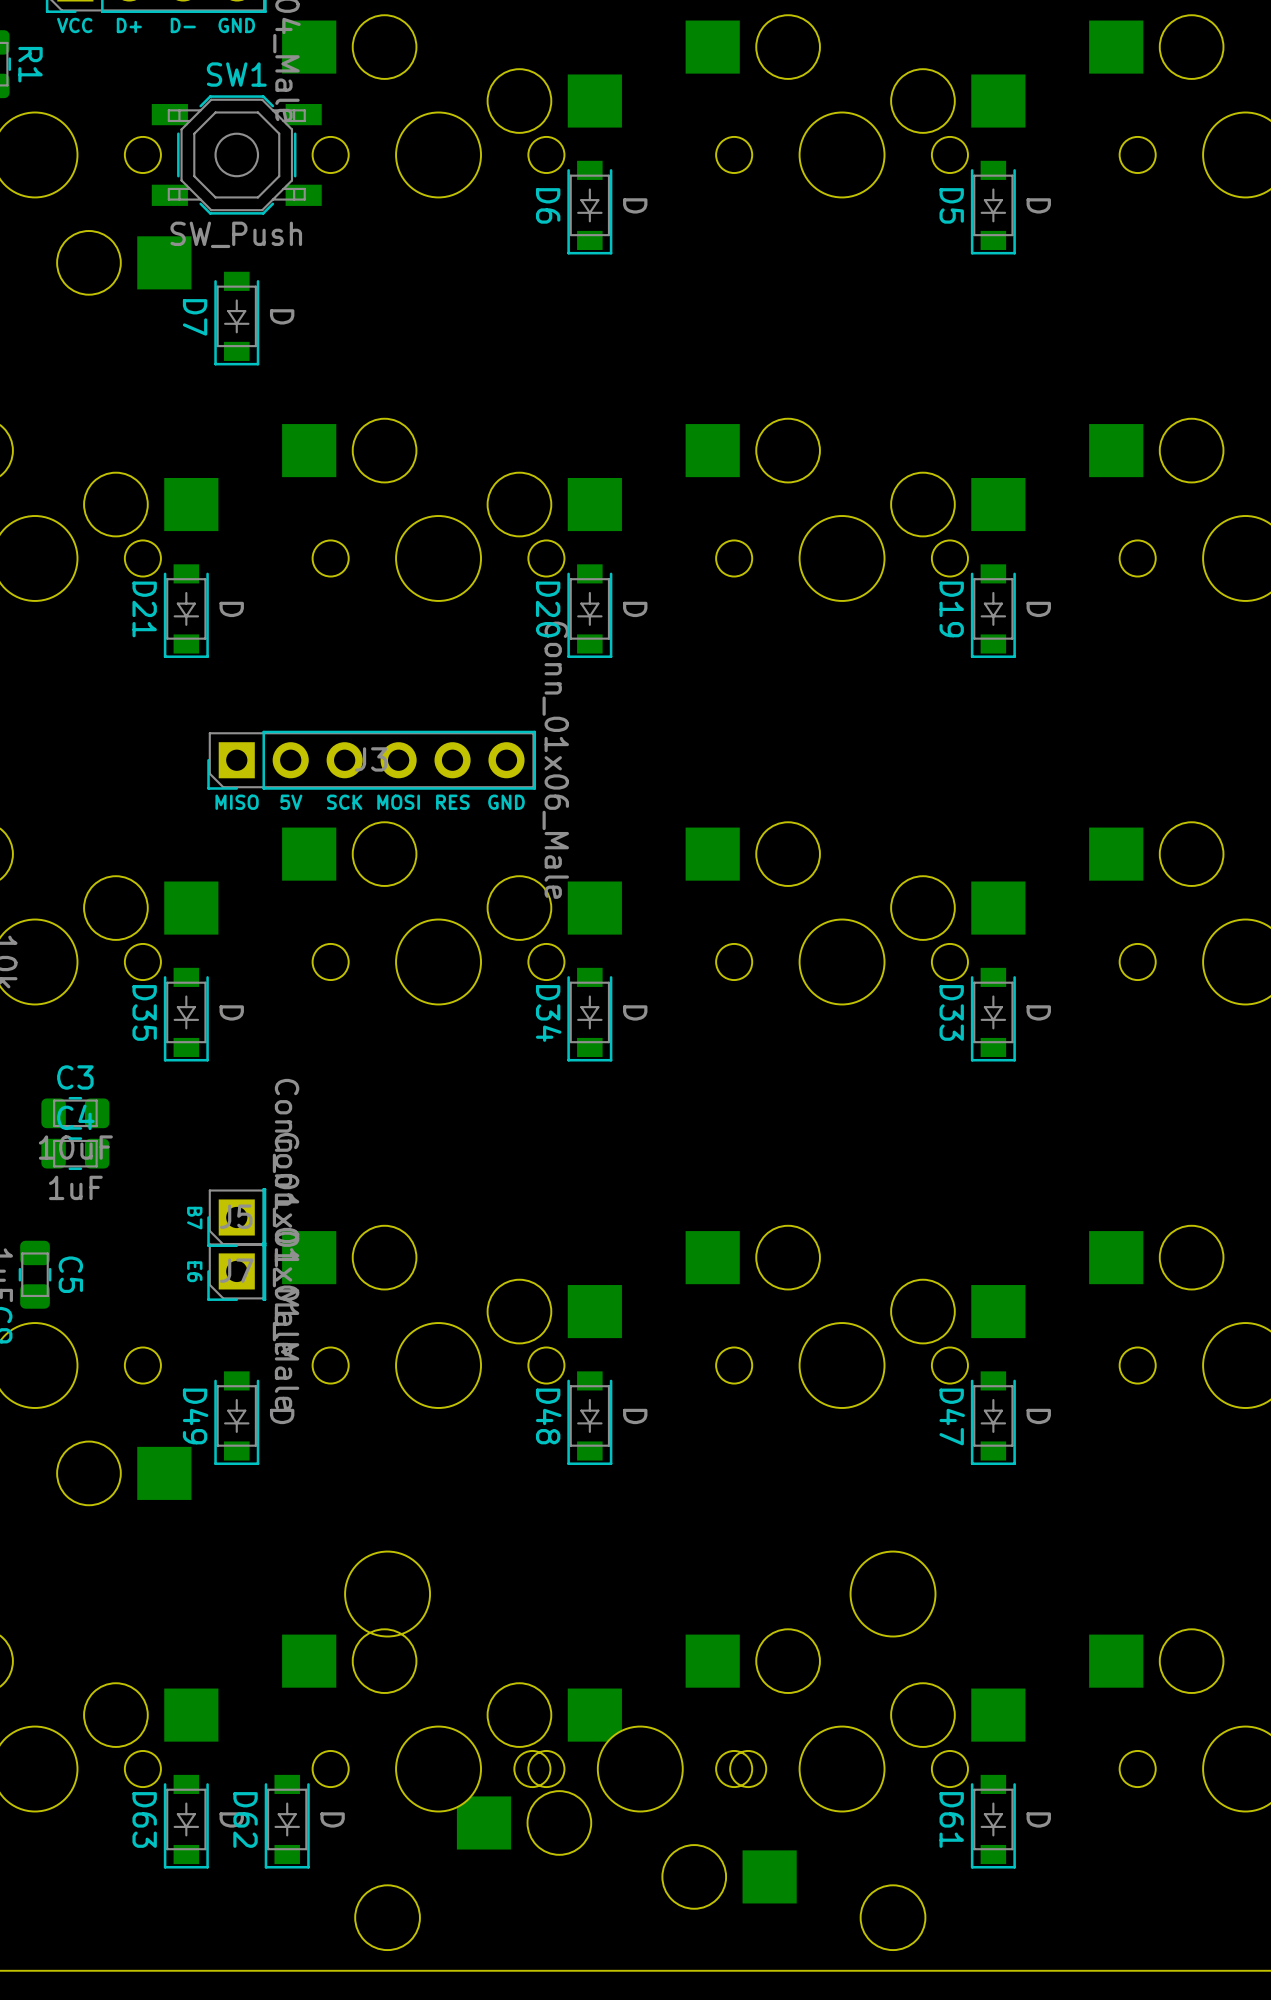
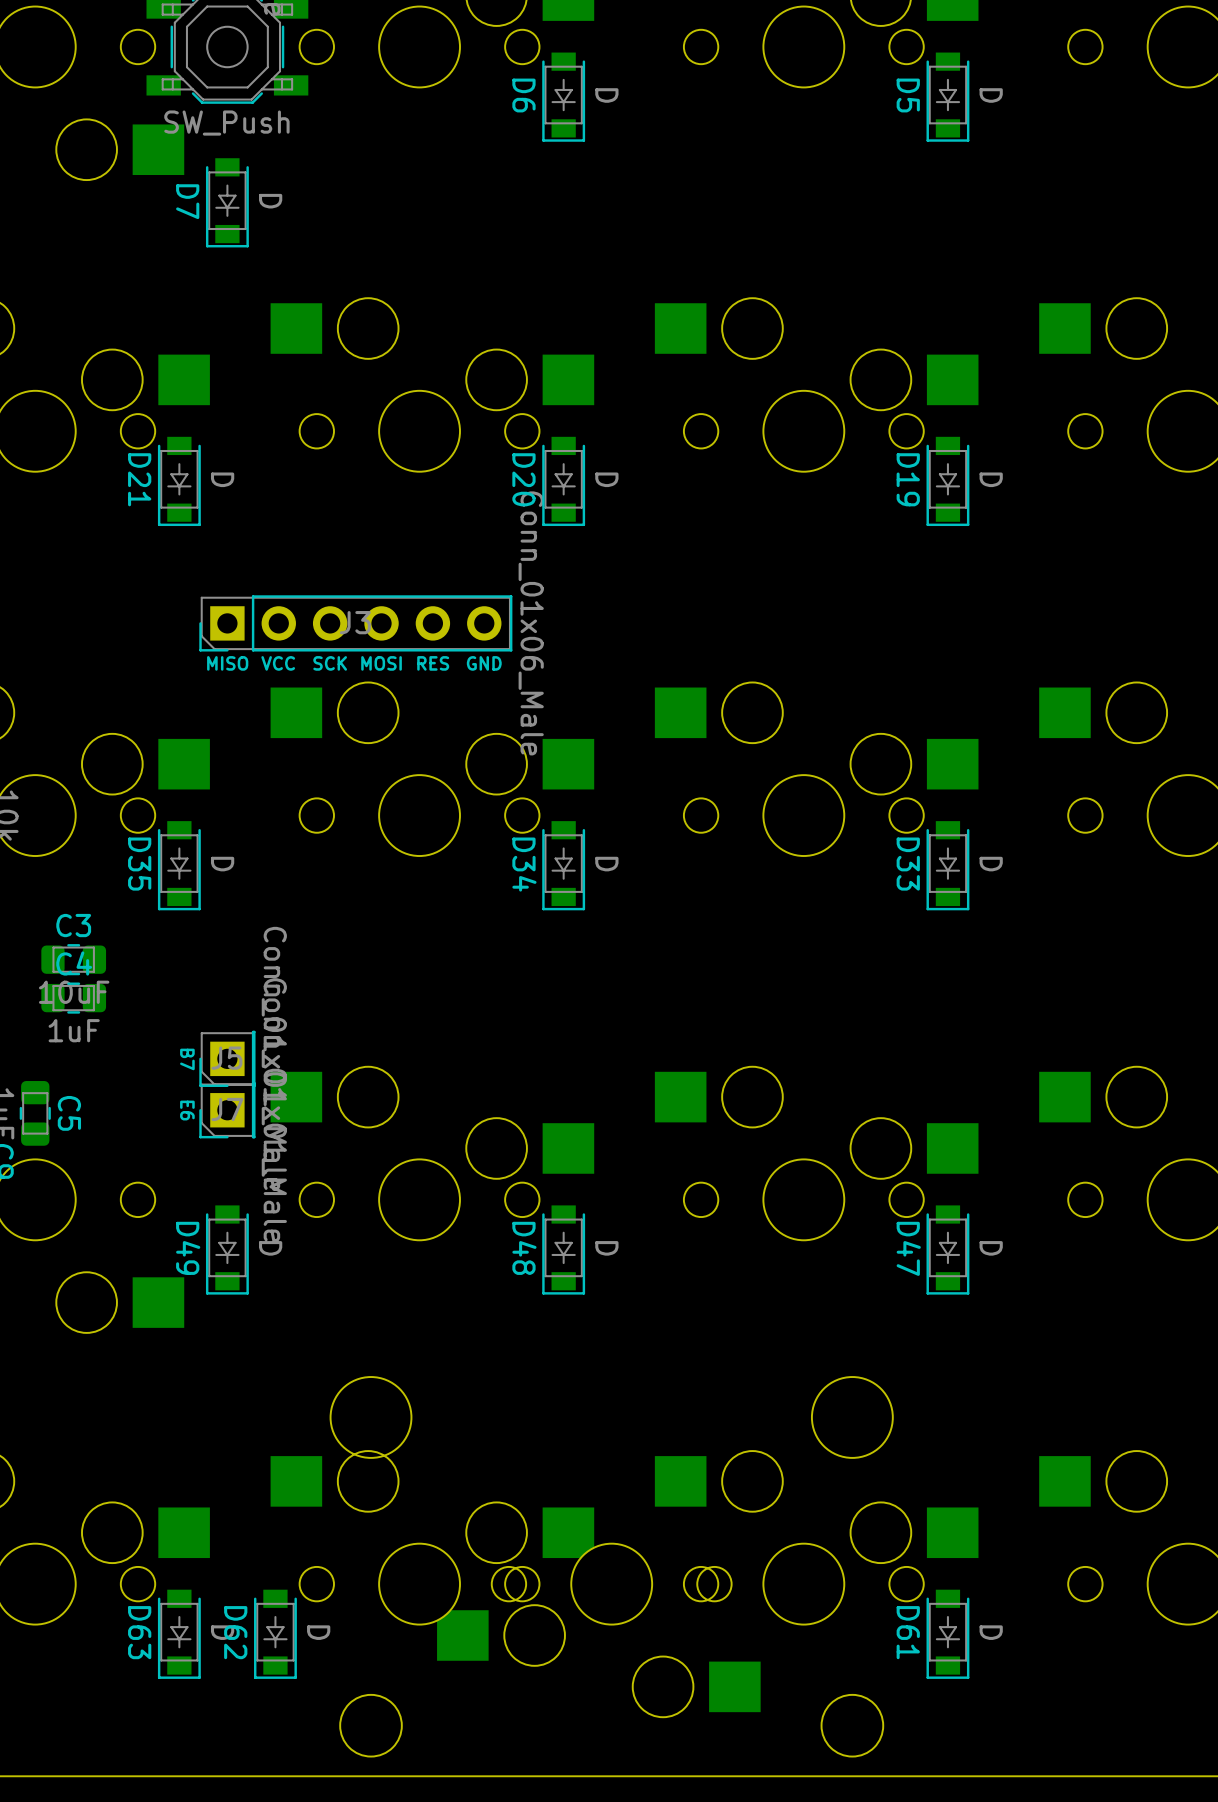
text: 5V (291, 802) -> VCC (278, 663)

